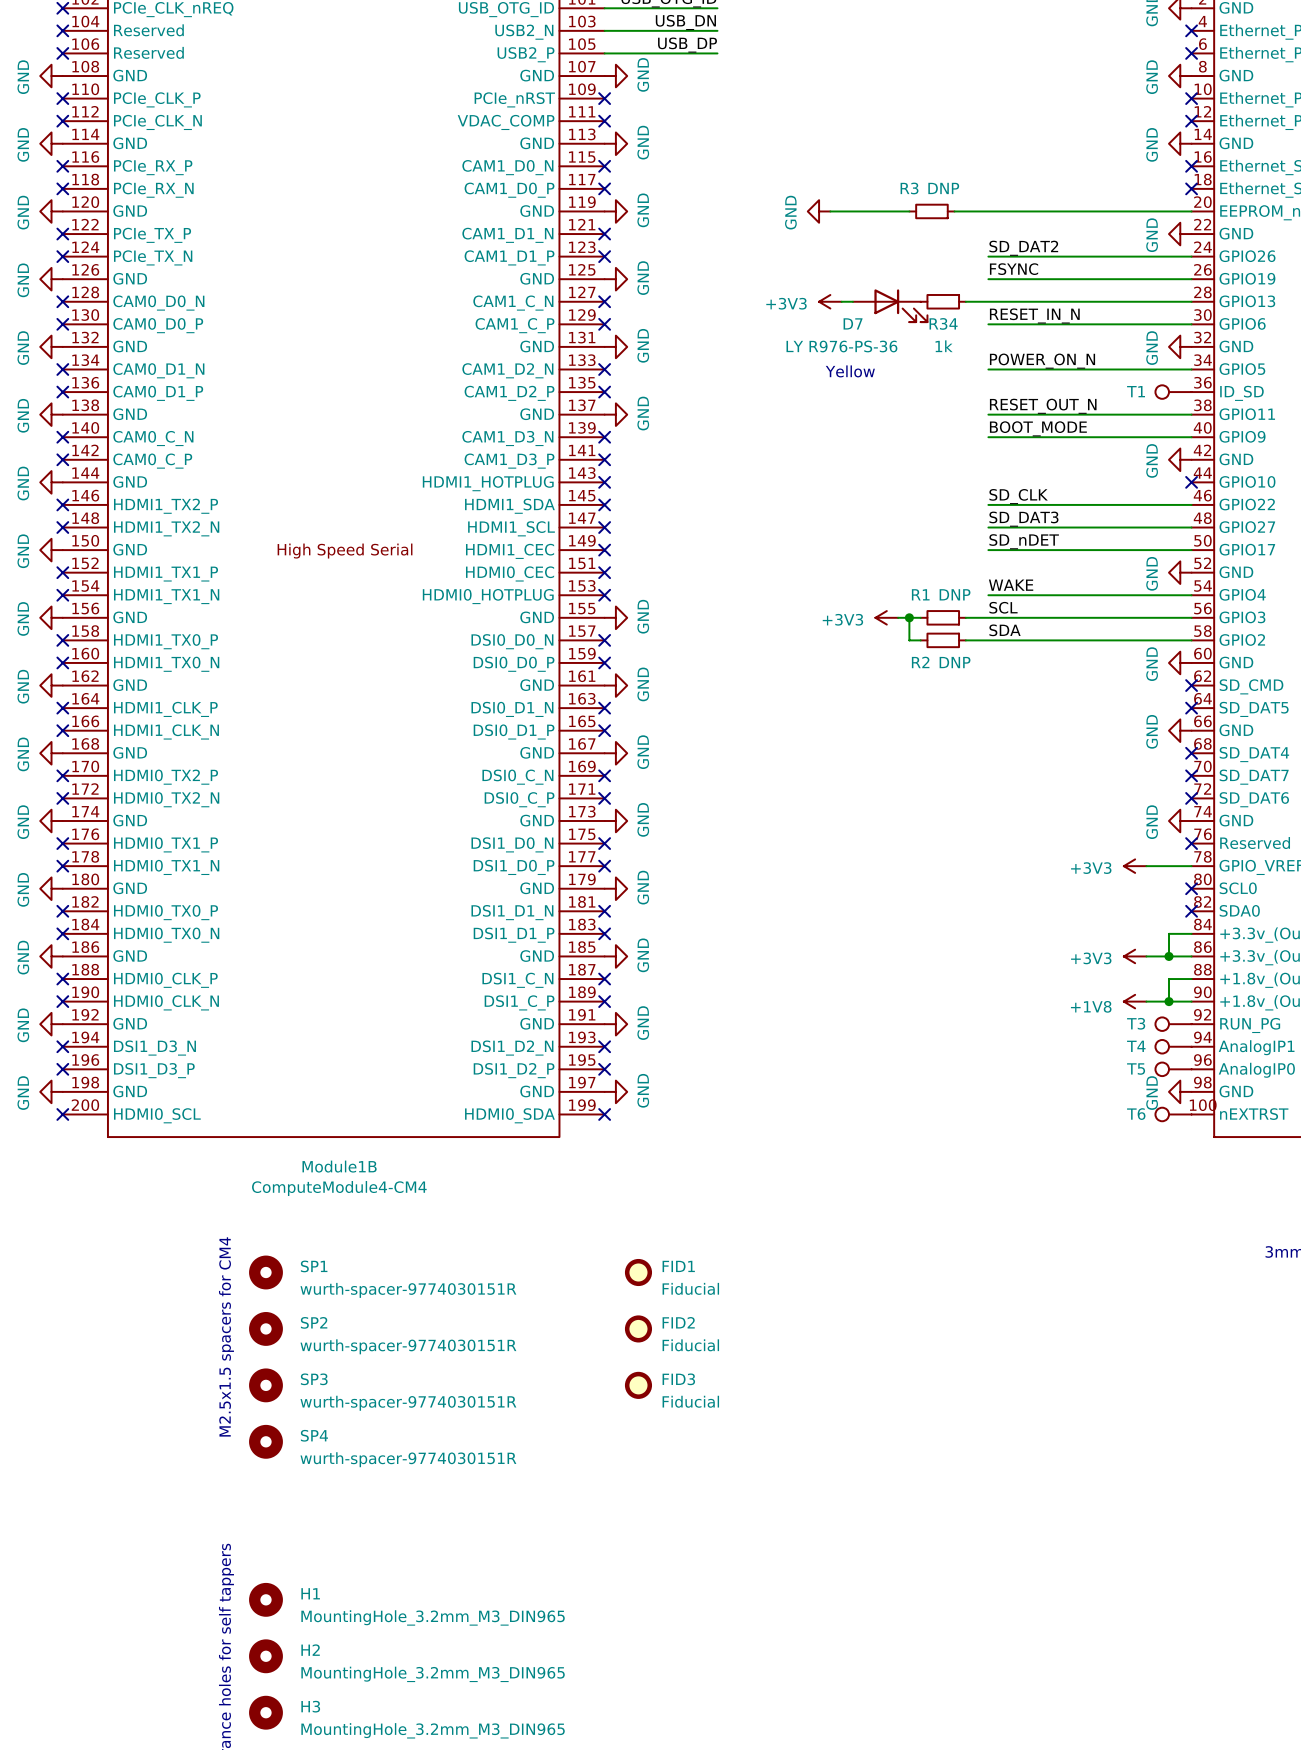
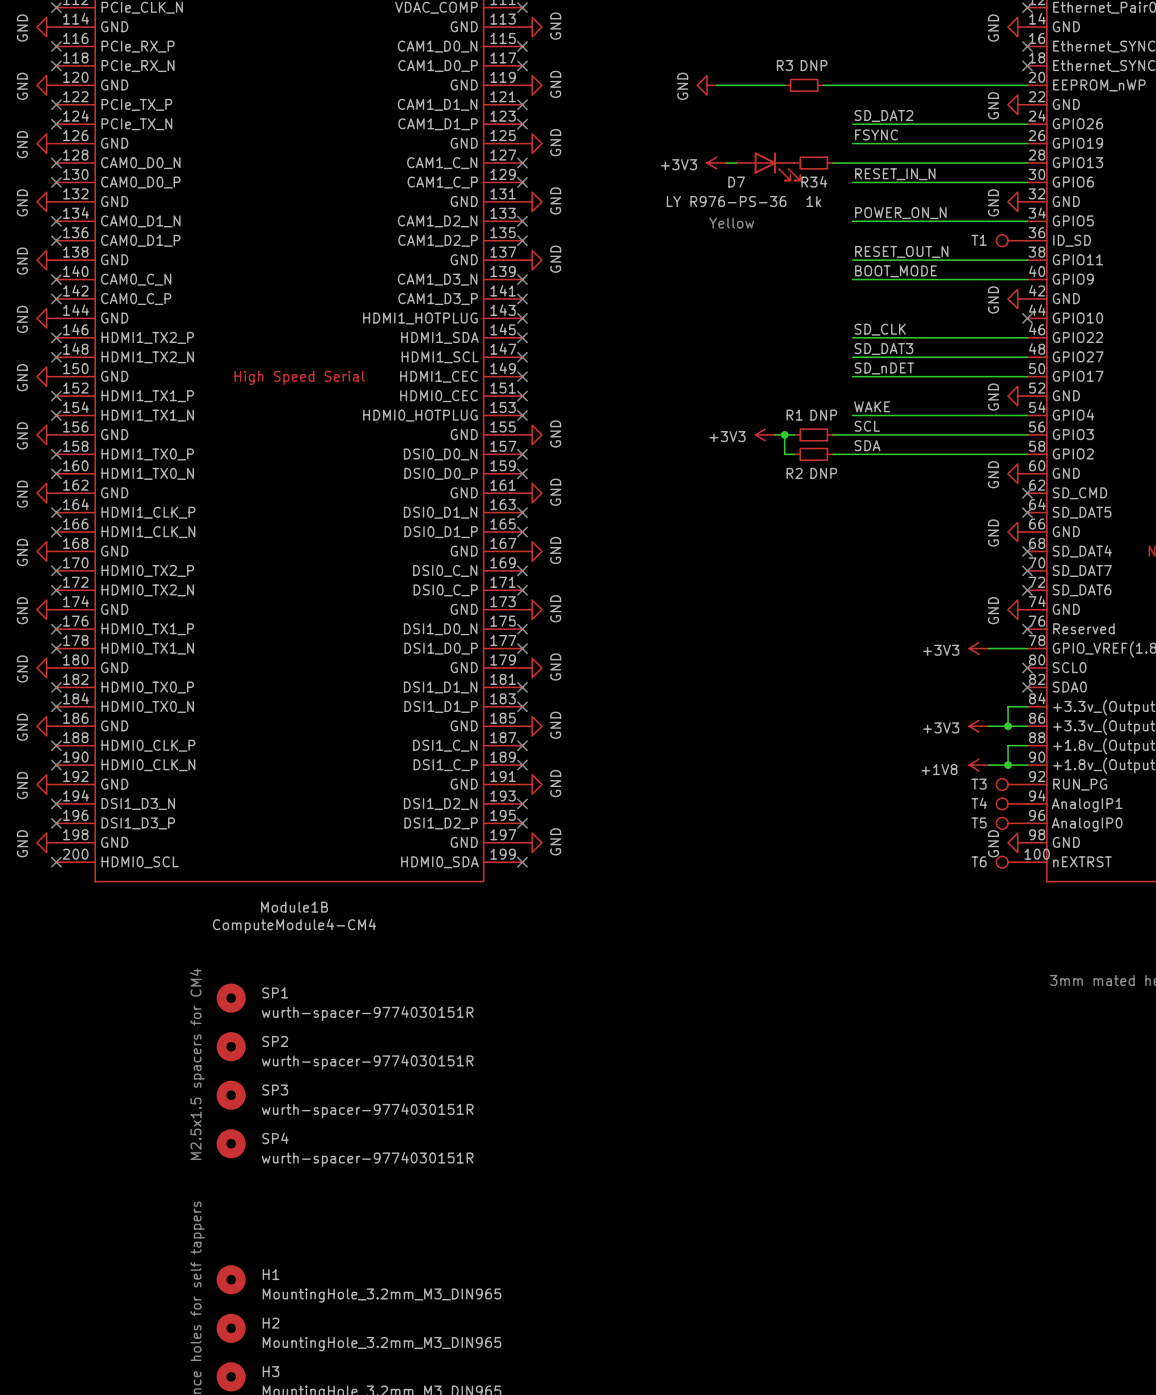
FID1: Fiducial (638, 1272) -> none
FID2: Fiducial (638, 1328) -> none
FID3: Fiducial (638, 1385) -> none

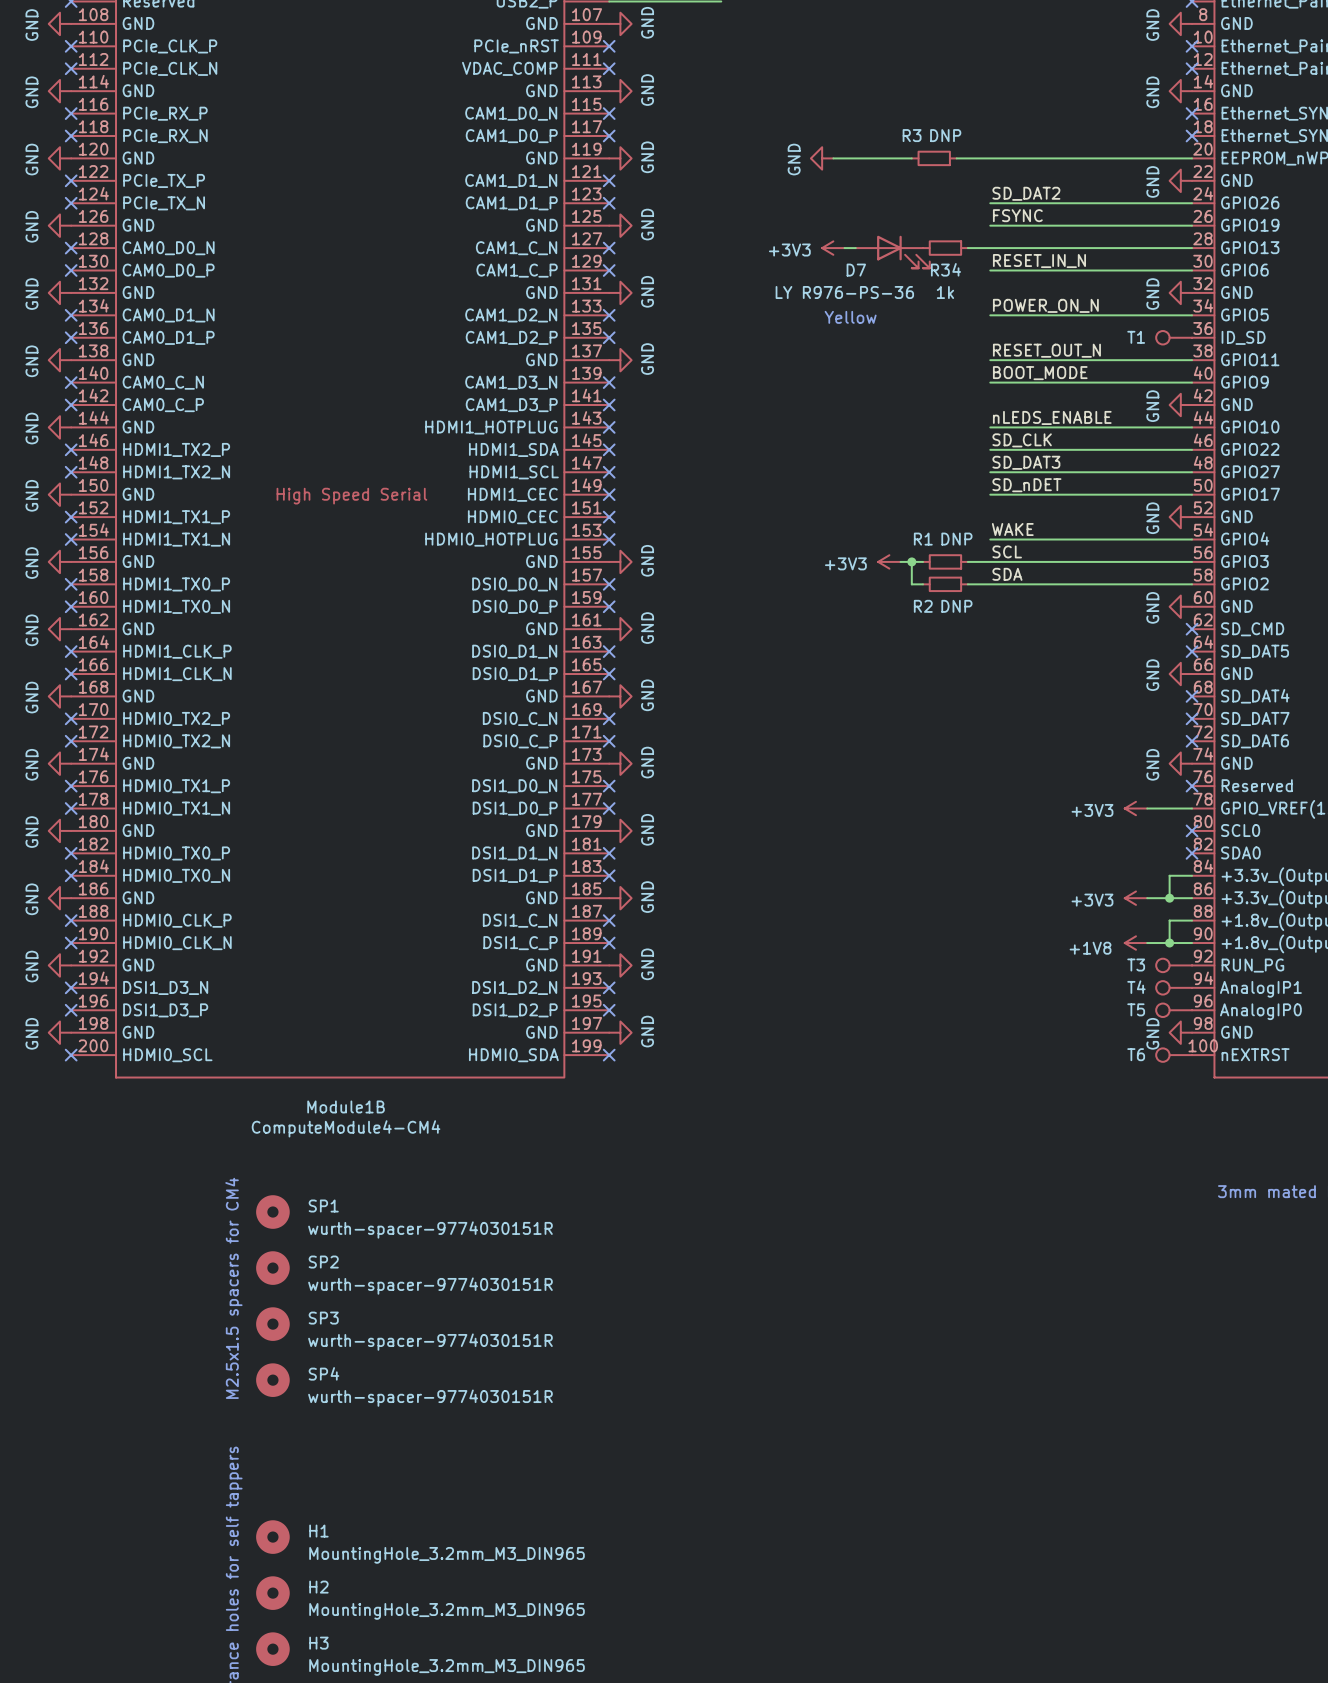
label: none -> nLEDS_ENABLE (1052, 417)
wire: none -> (990, 427) (1192, 427)
no-connect mark: (1027, 318) -> none

